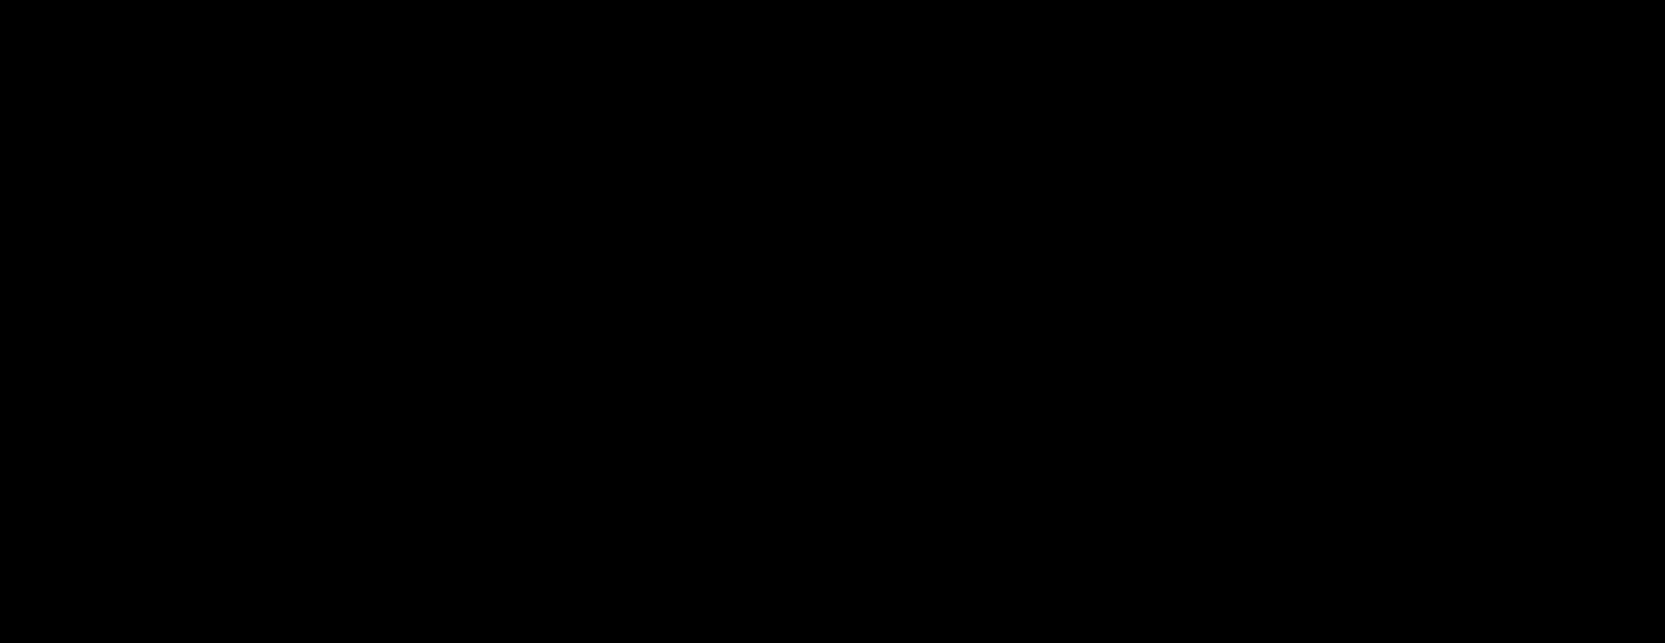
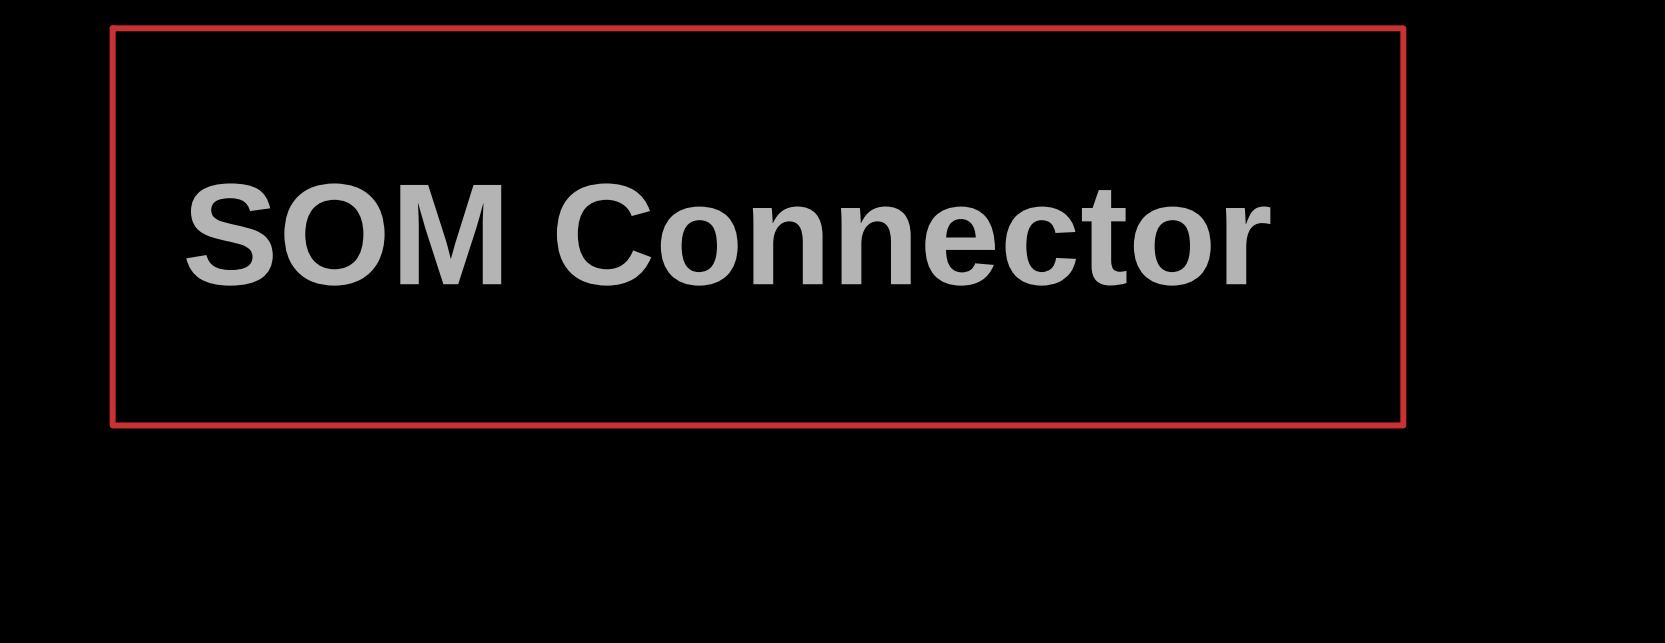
sheet SOM Connector: none -> (757, 226)

